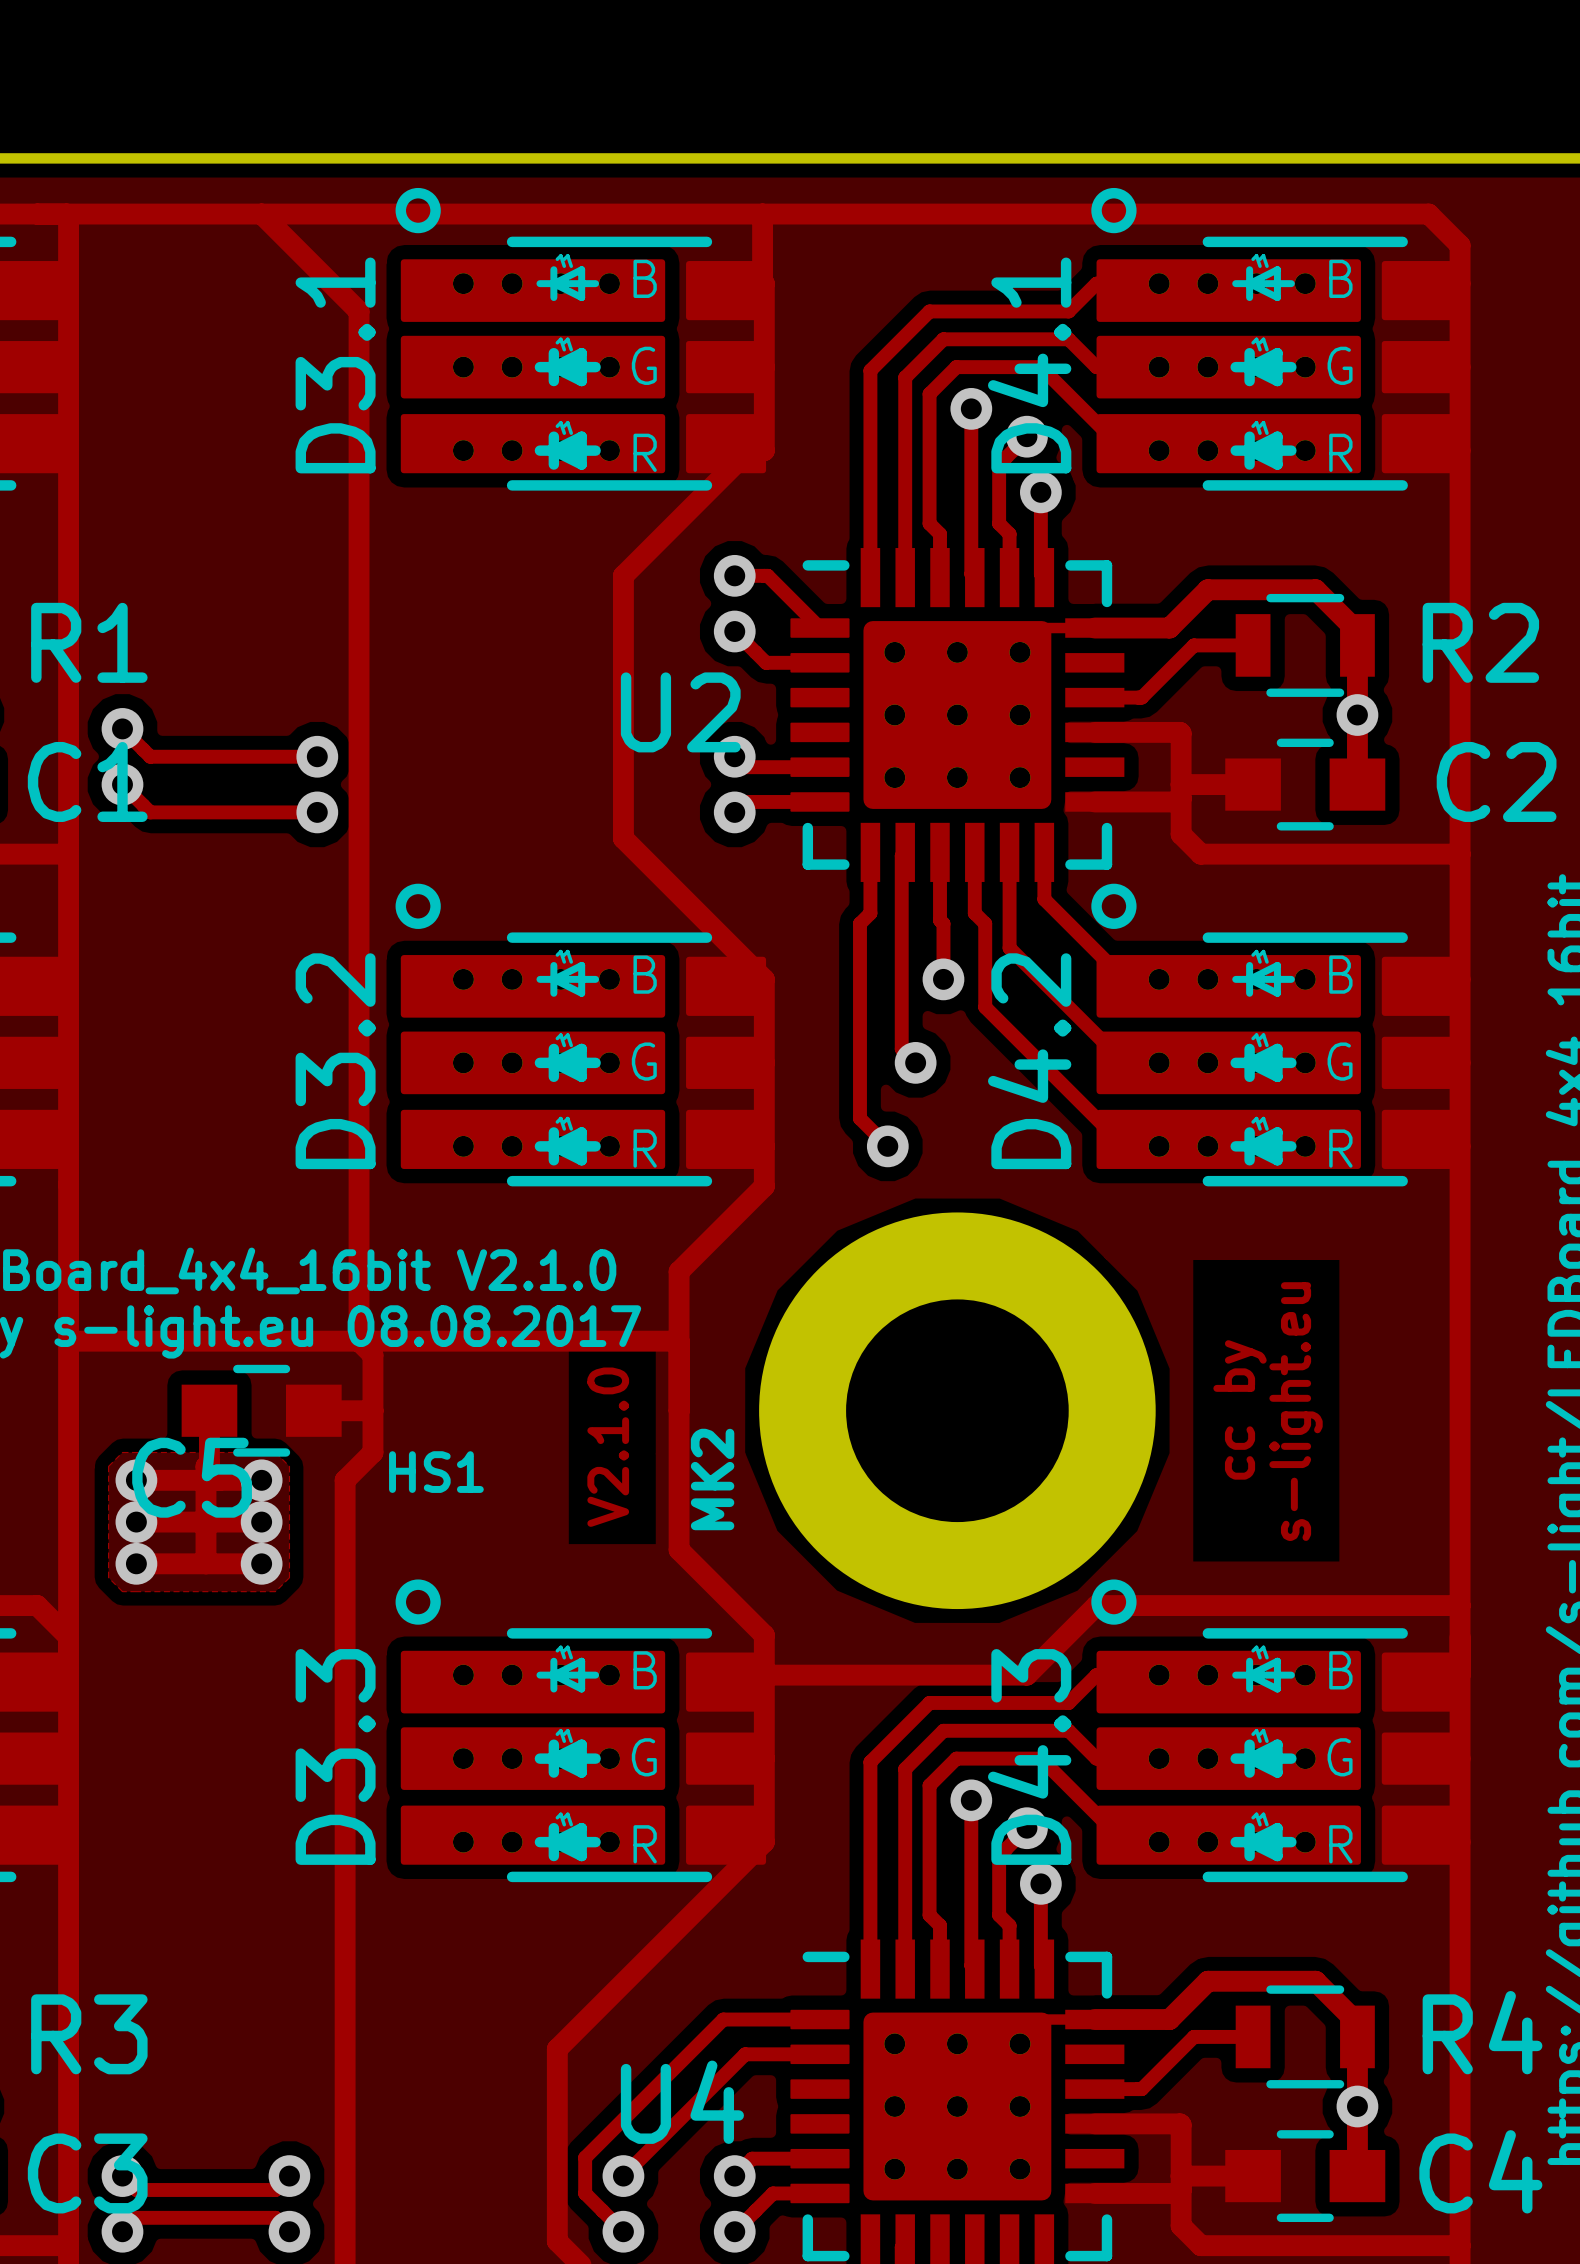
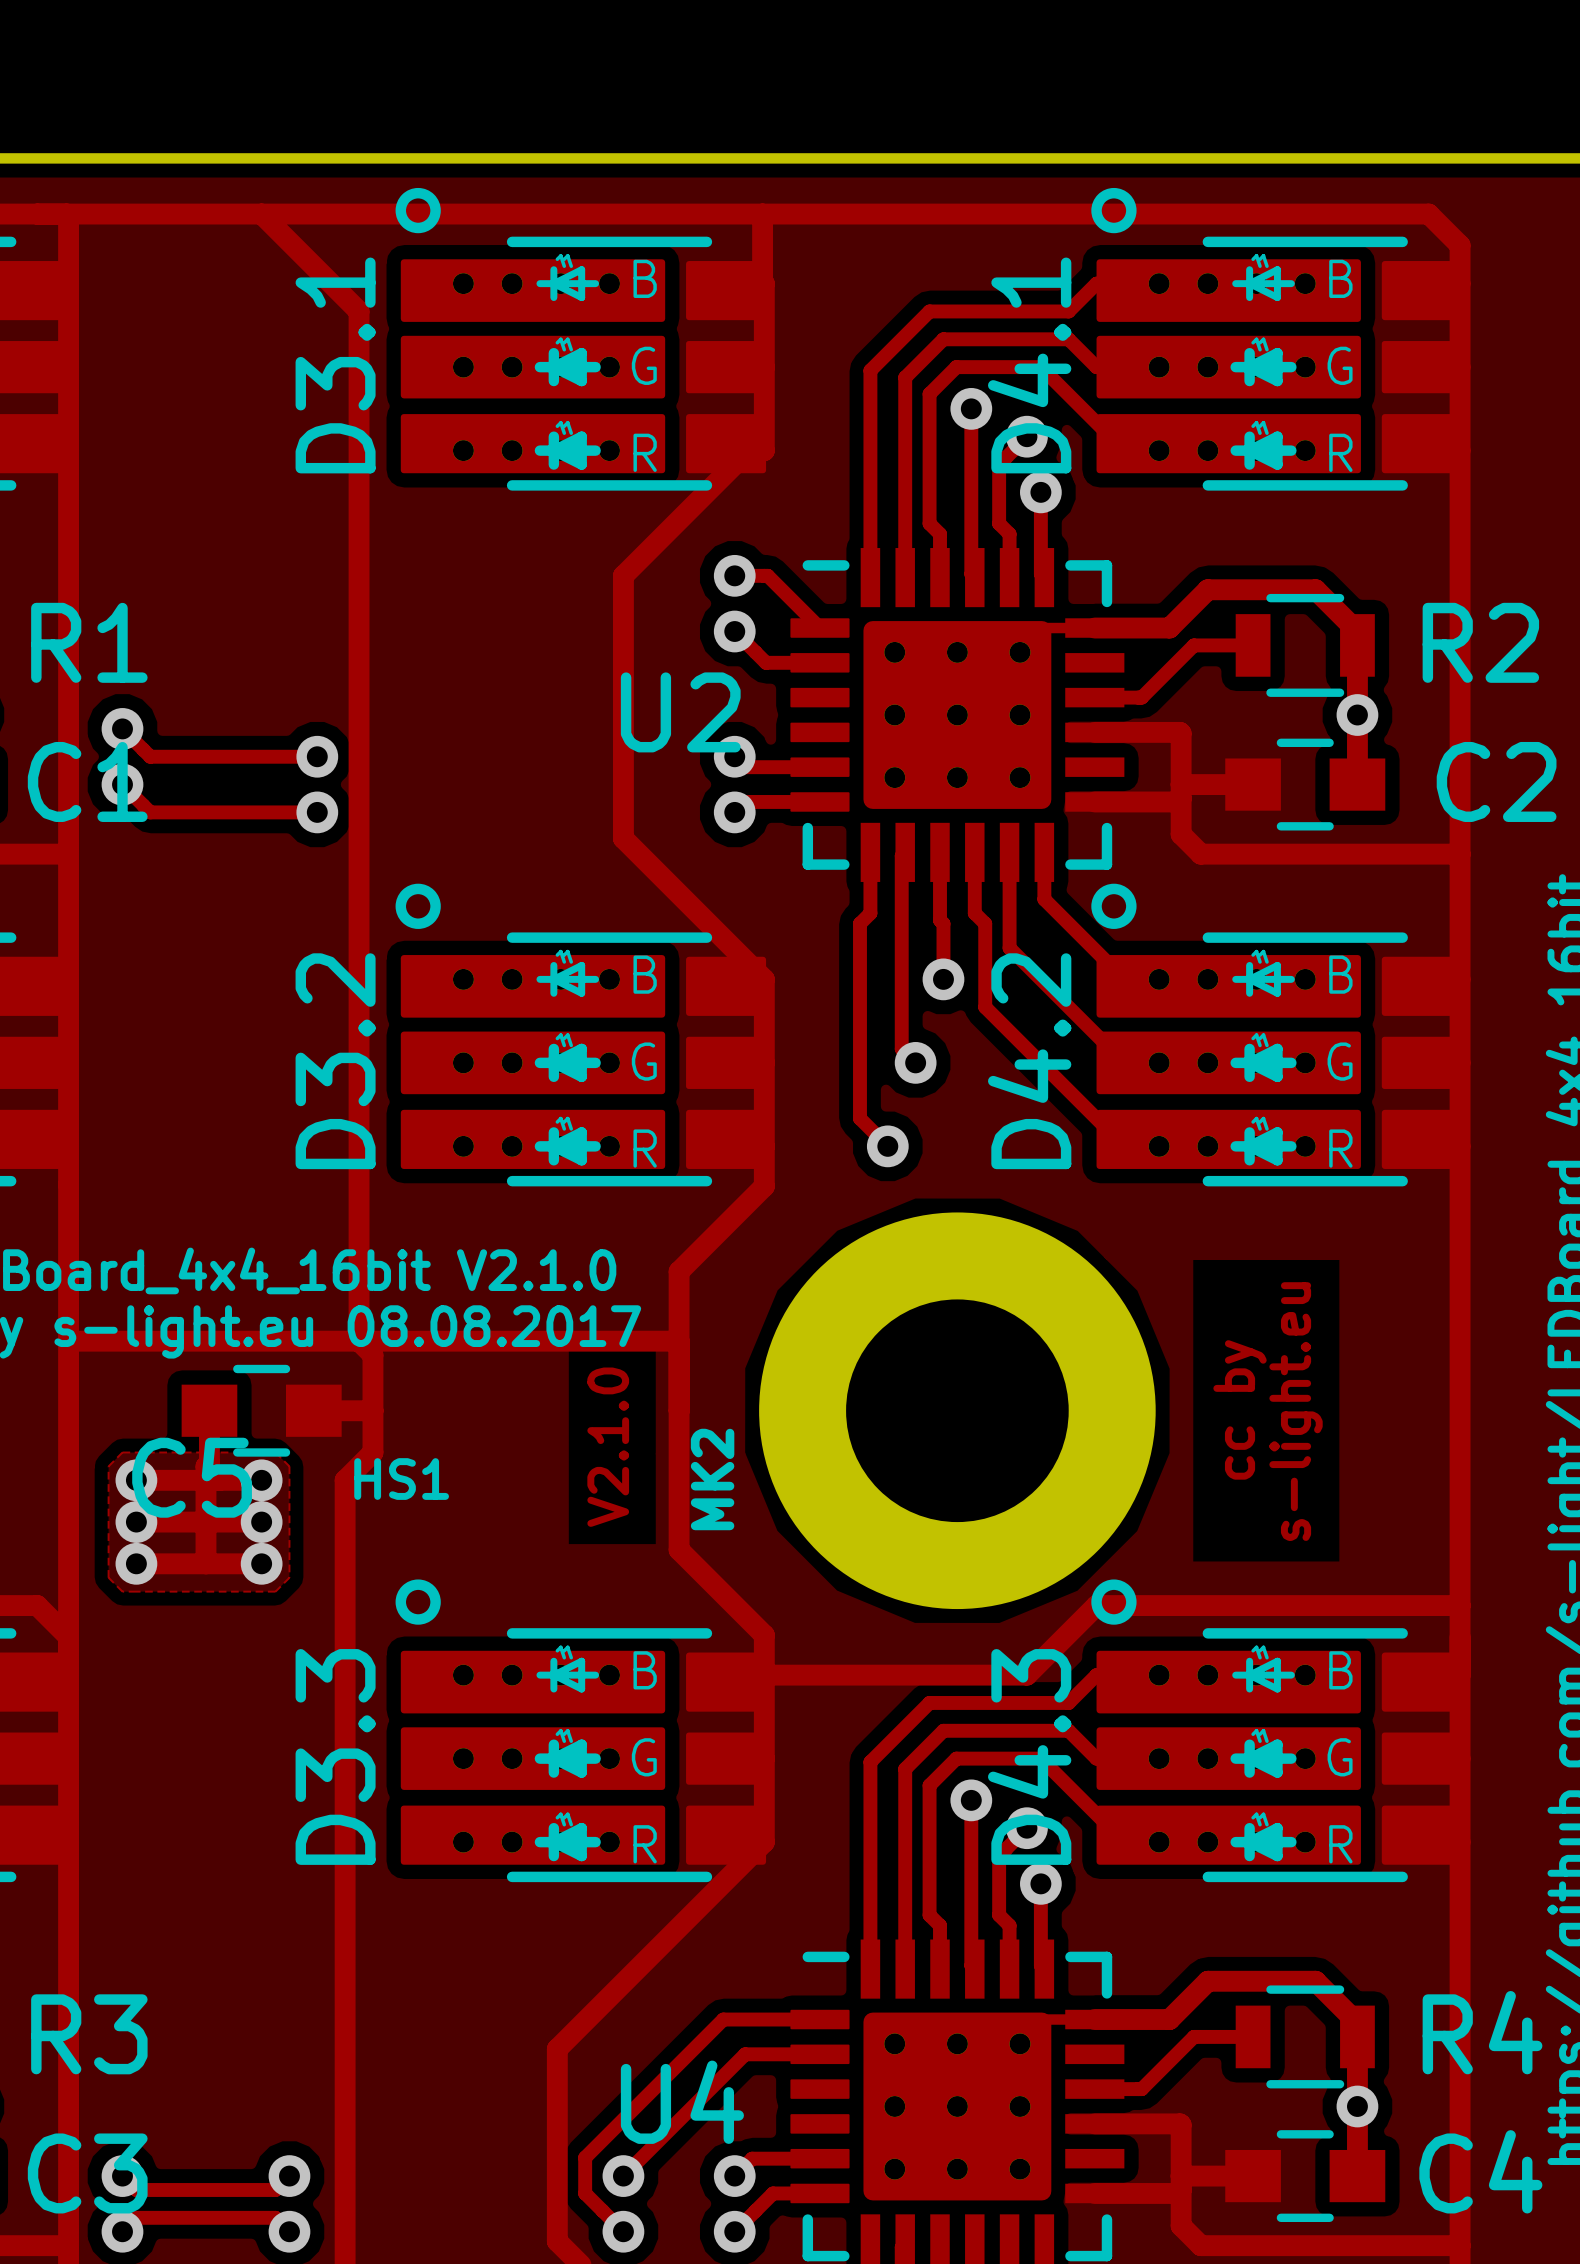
HS1 position: (436, 1472) -> (401, 1479)

